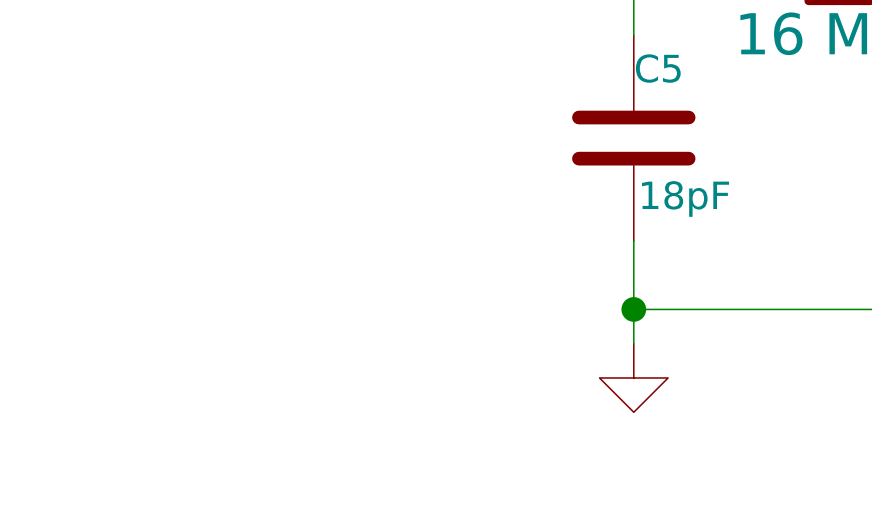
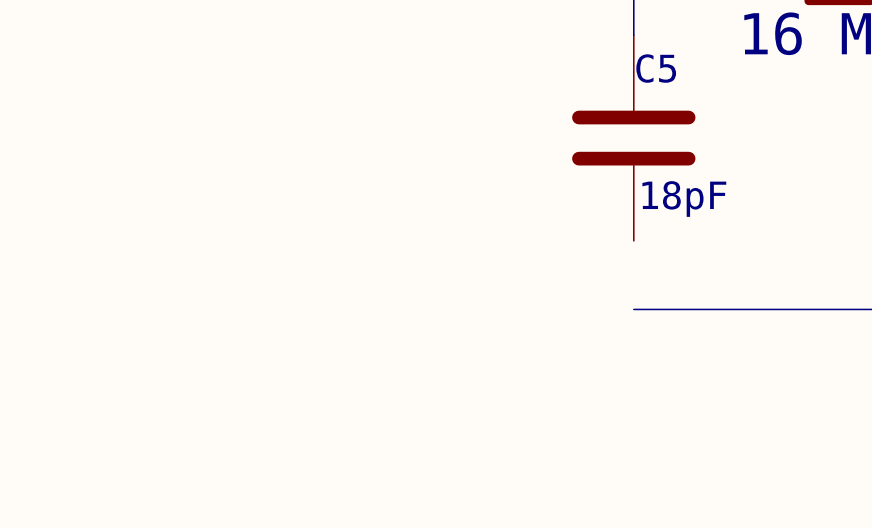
wire: (633, 240) (633, 343) -> none
junction: (633, 309) -> none
power symbol: (633, 377) -> none

